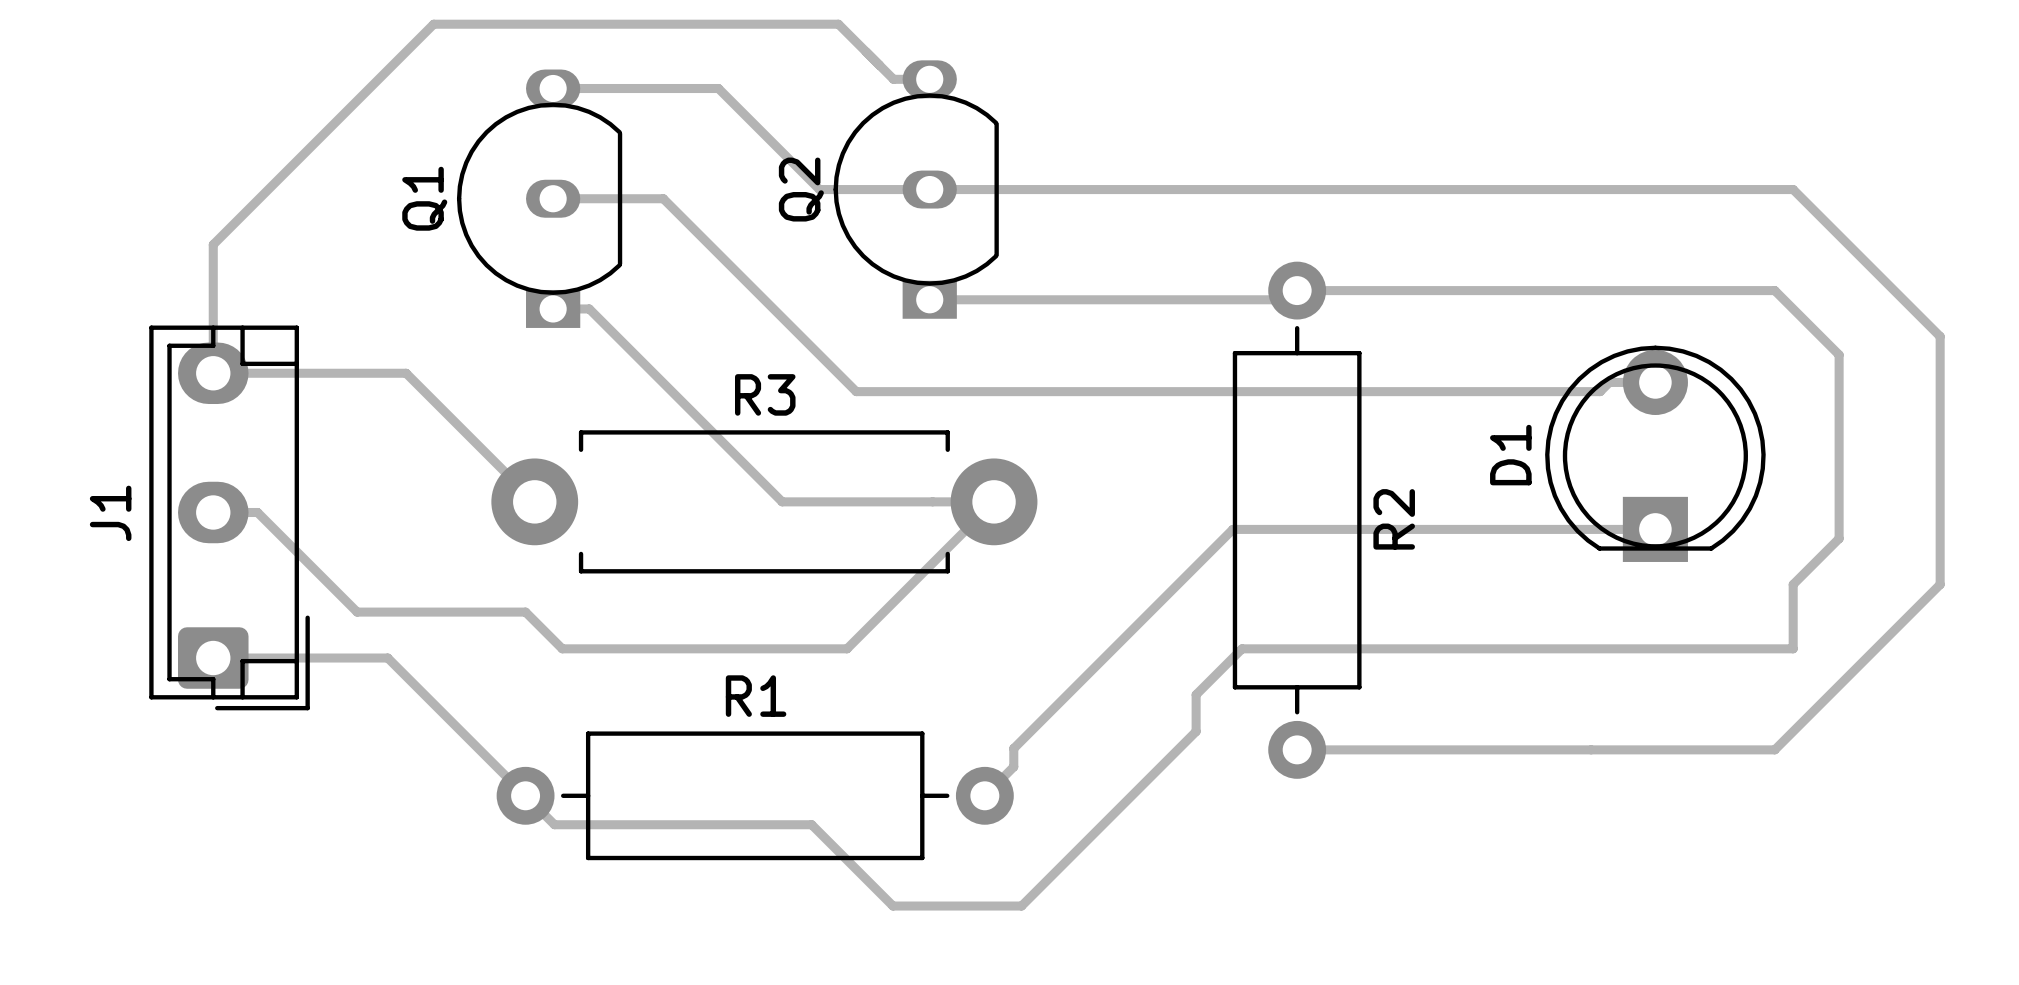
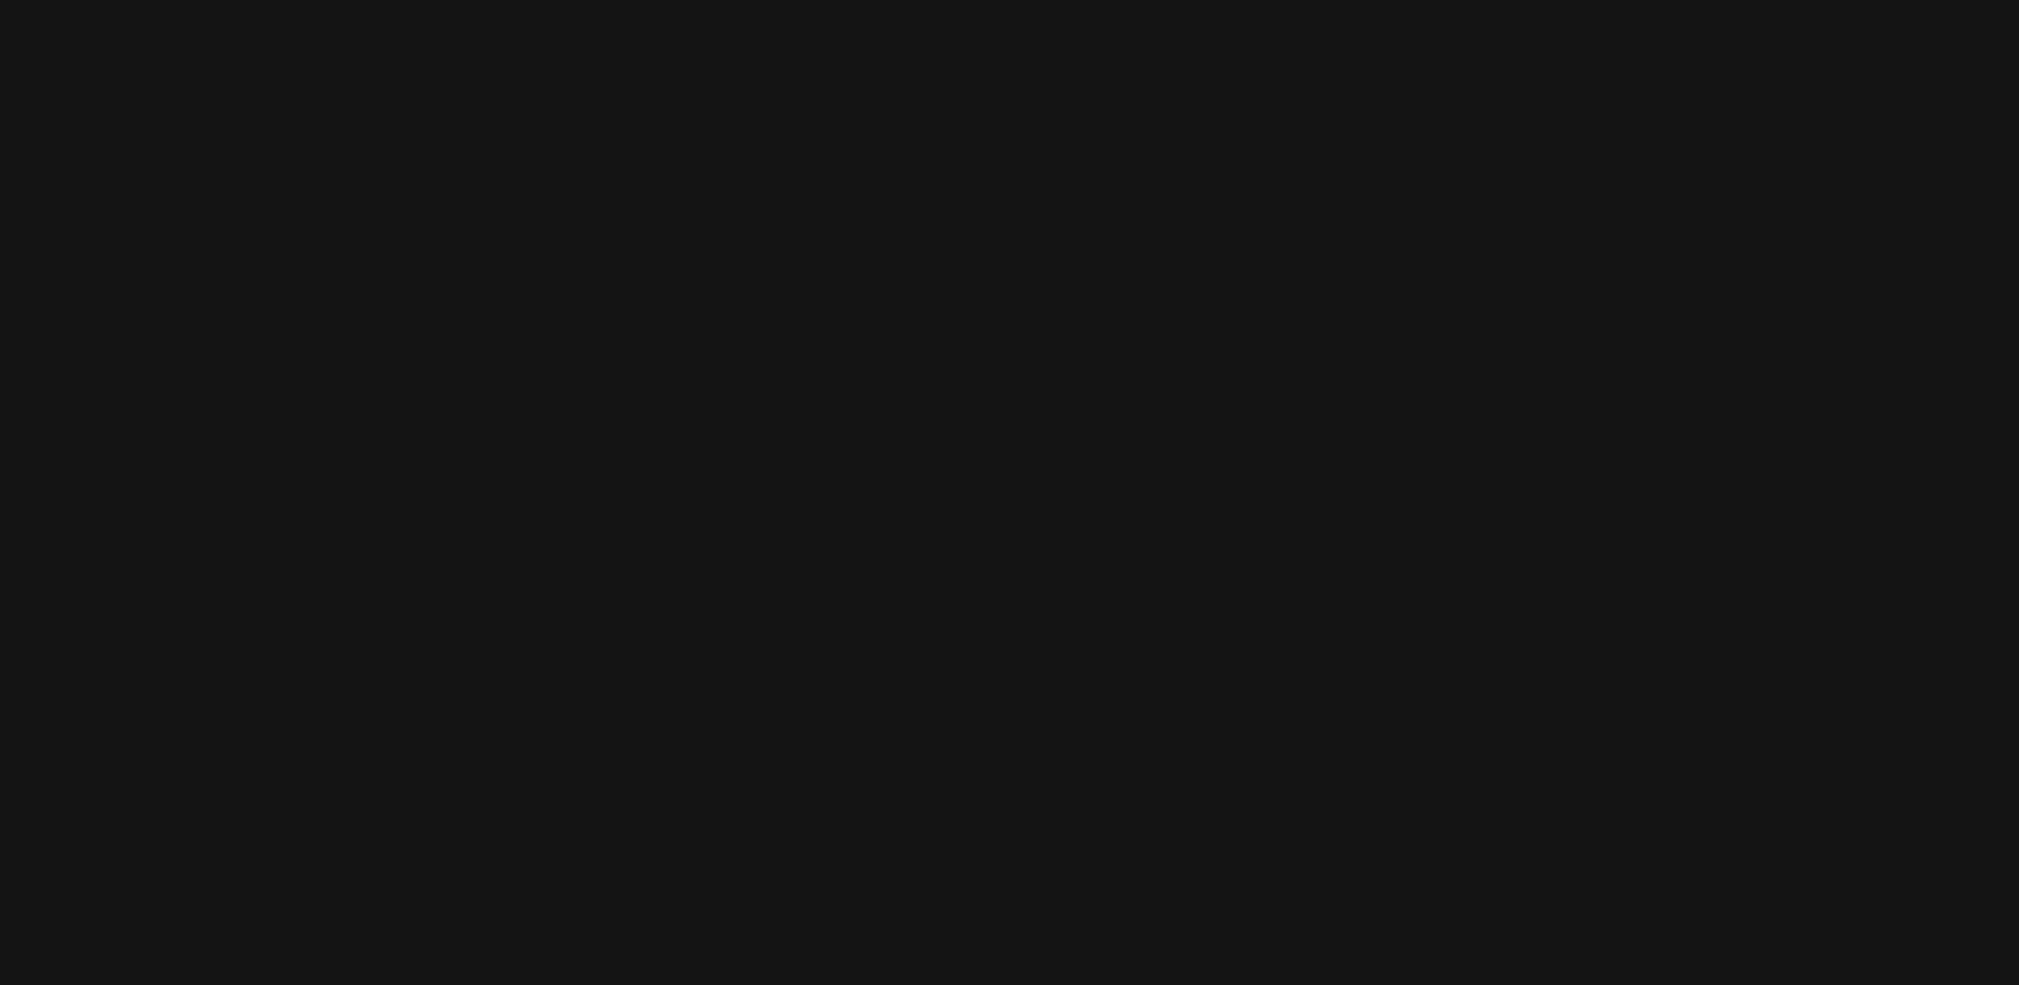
track: (929, 79) (893, 79) (838, 24) (433, 24) (213, 244) (213, 373) (406, 373) (534, 501) -> none
track: (553, 88) (718, 88) (819, 189) (1793, 189) (1940, 336) (1940, 584) (1774, 749) (1297, 749) -> none
Q2: (916, 189) -> none
Q1: (539, 198) -> none
track: (553, 198) (663, 198) (856, 391) (1600, 391) (1609, 382) (1655, 382) -> none
track: (929, 299) (1287, 299) (1297, 290) (1774, 290) (1839, 354) (1839, 538) (1793, 584) (1793, 648) (1242, 648) (1196, 694) (1196, 731) (1021, 906) (893, 906) (811, 824) (554, 824) (387, 658) (213, 658) -> none
track: (553, 308) (589, 308) (782, 501) (994, 501) (847, 648) (562, 648) (525, 612) (357, 612) (257, 512) (213, 512) -> none
D1: (1655, 453) -> none
R3: (764, 501) -> none
J1: (229, 517) -> none
R2: (1297, 520) -> none
track: (1655, 529) (1232, 529) (1013, 748) (1013, 766) (984, 795) -> none
R1: (755, 795) -> none

